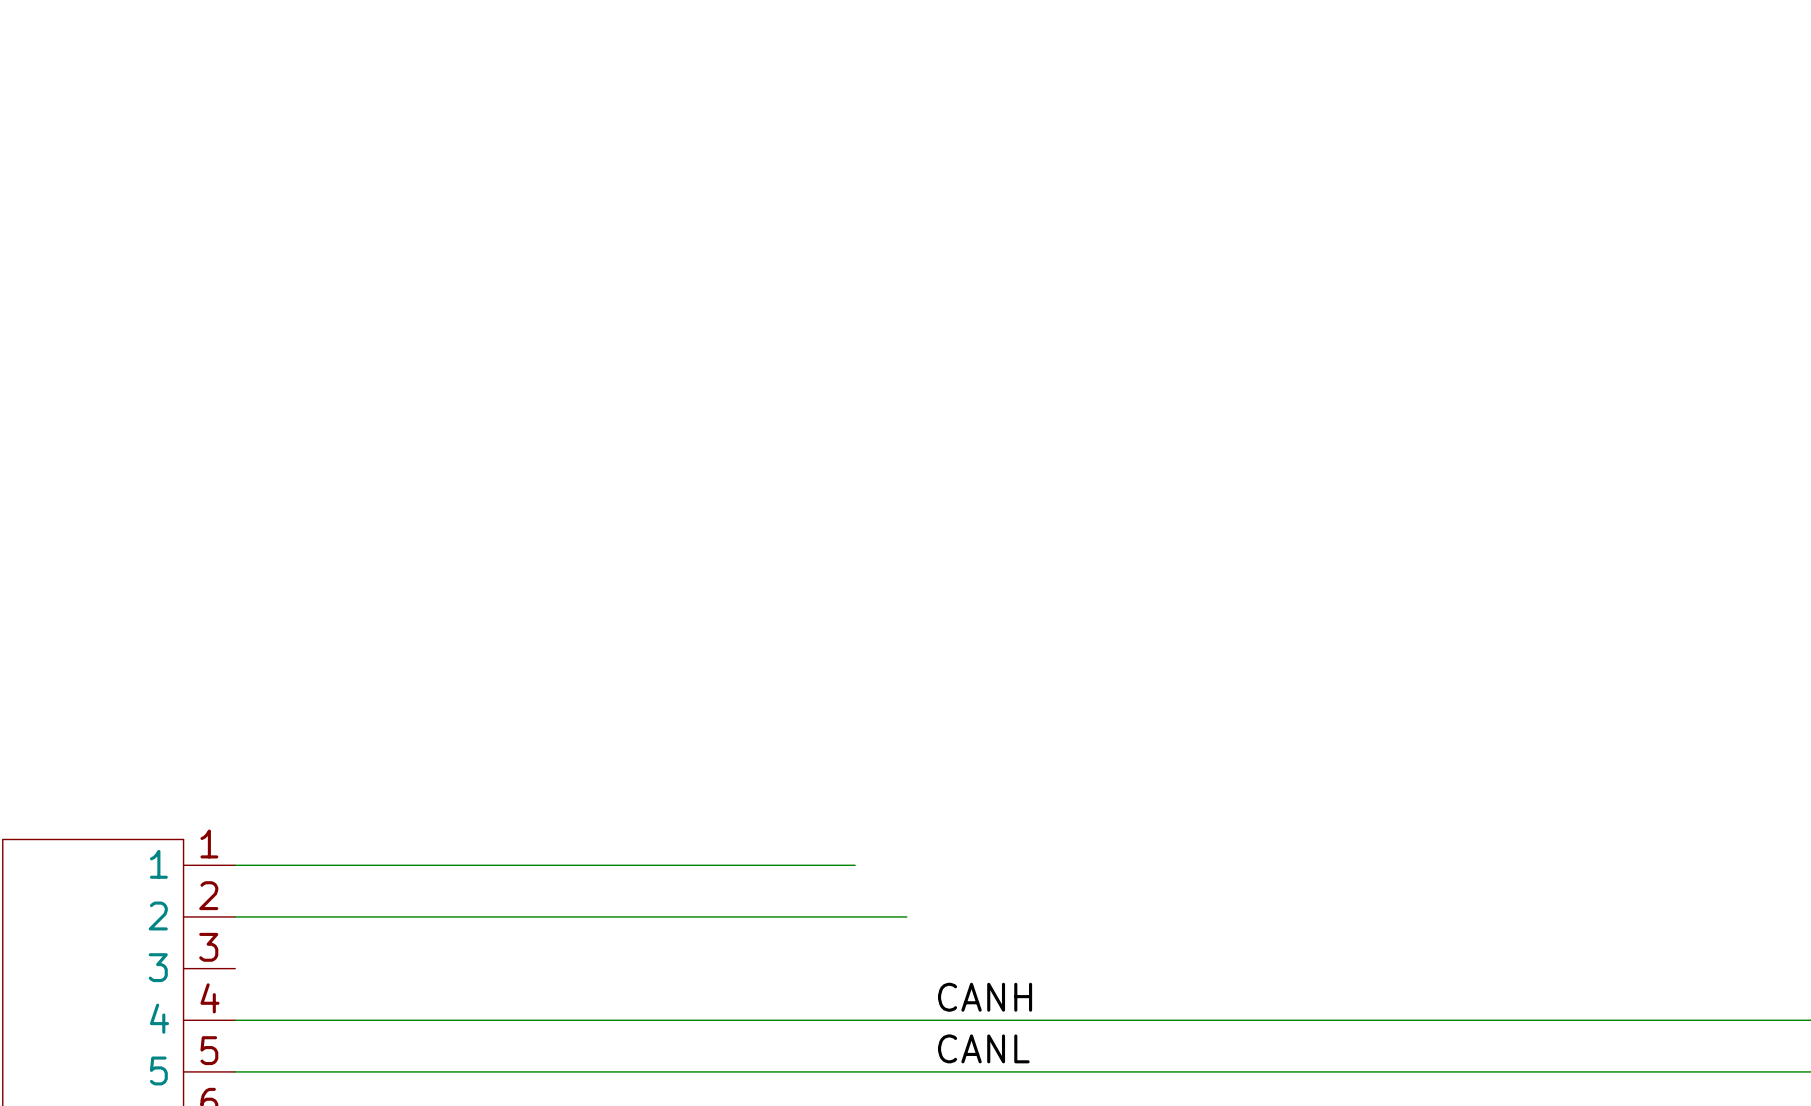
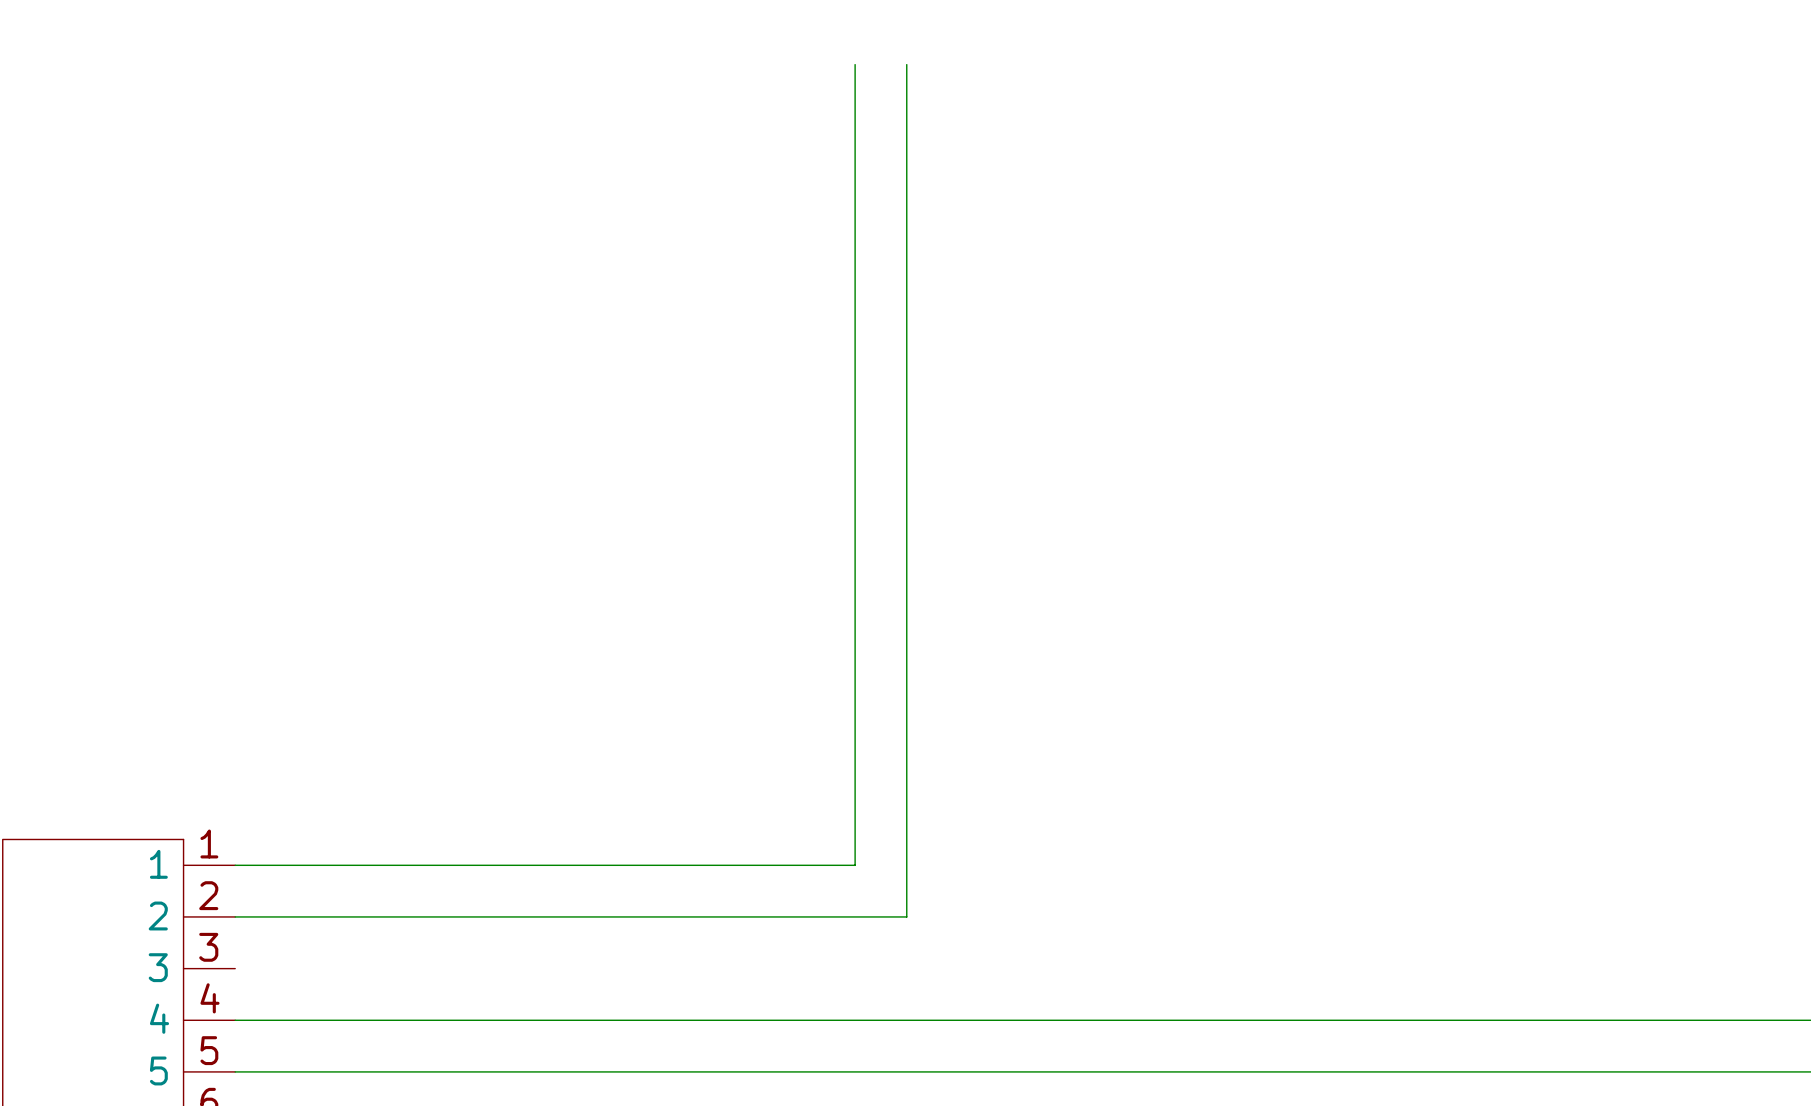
wire: none -> (855, 64) (855, 865)
wire: none -> (906, 64) (906, 916)
label: CANH (985, 997) -> none
label: CANL (983, 1048) -> none

